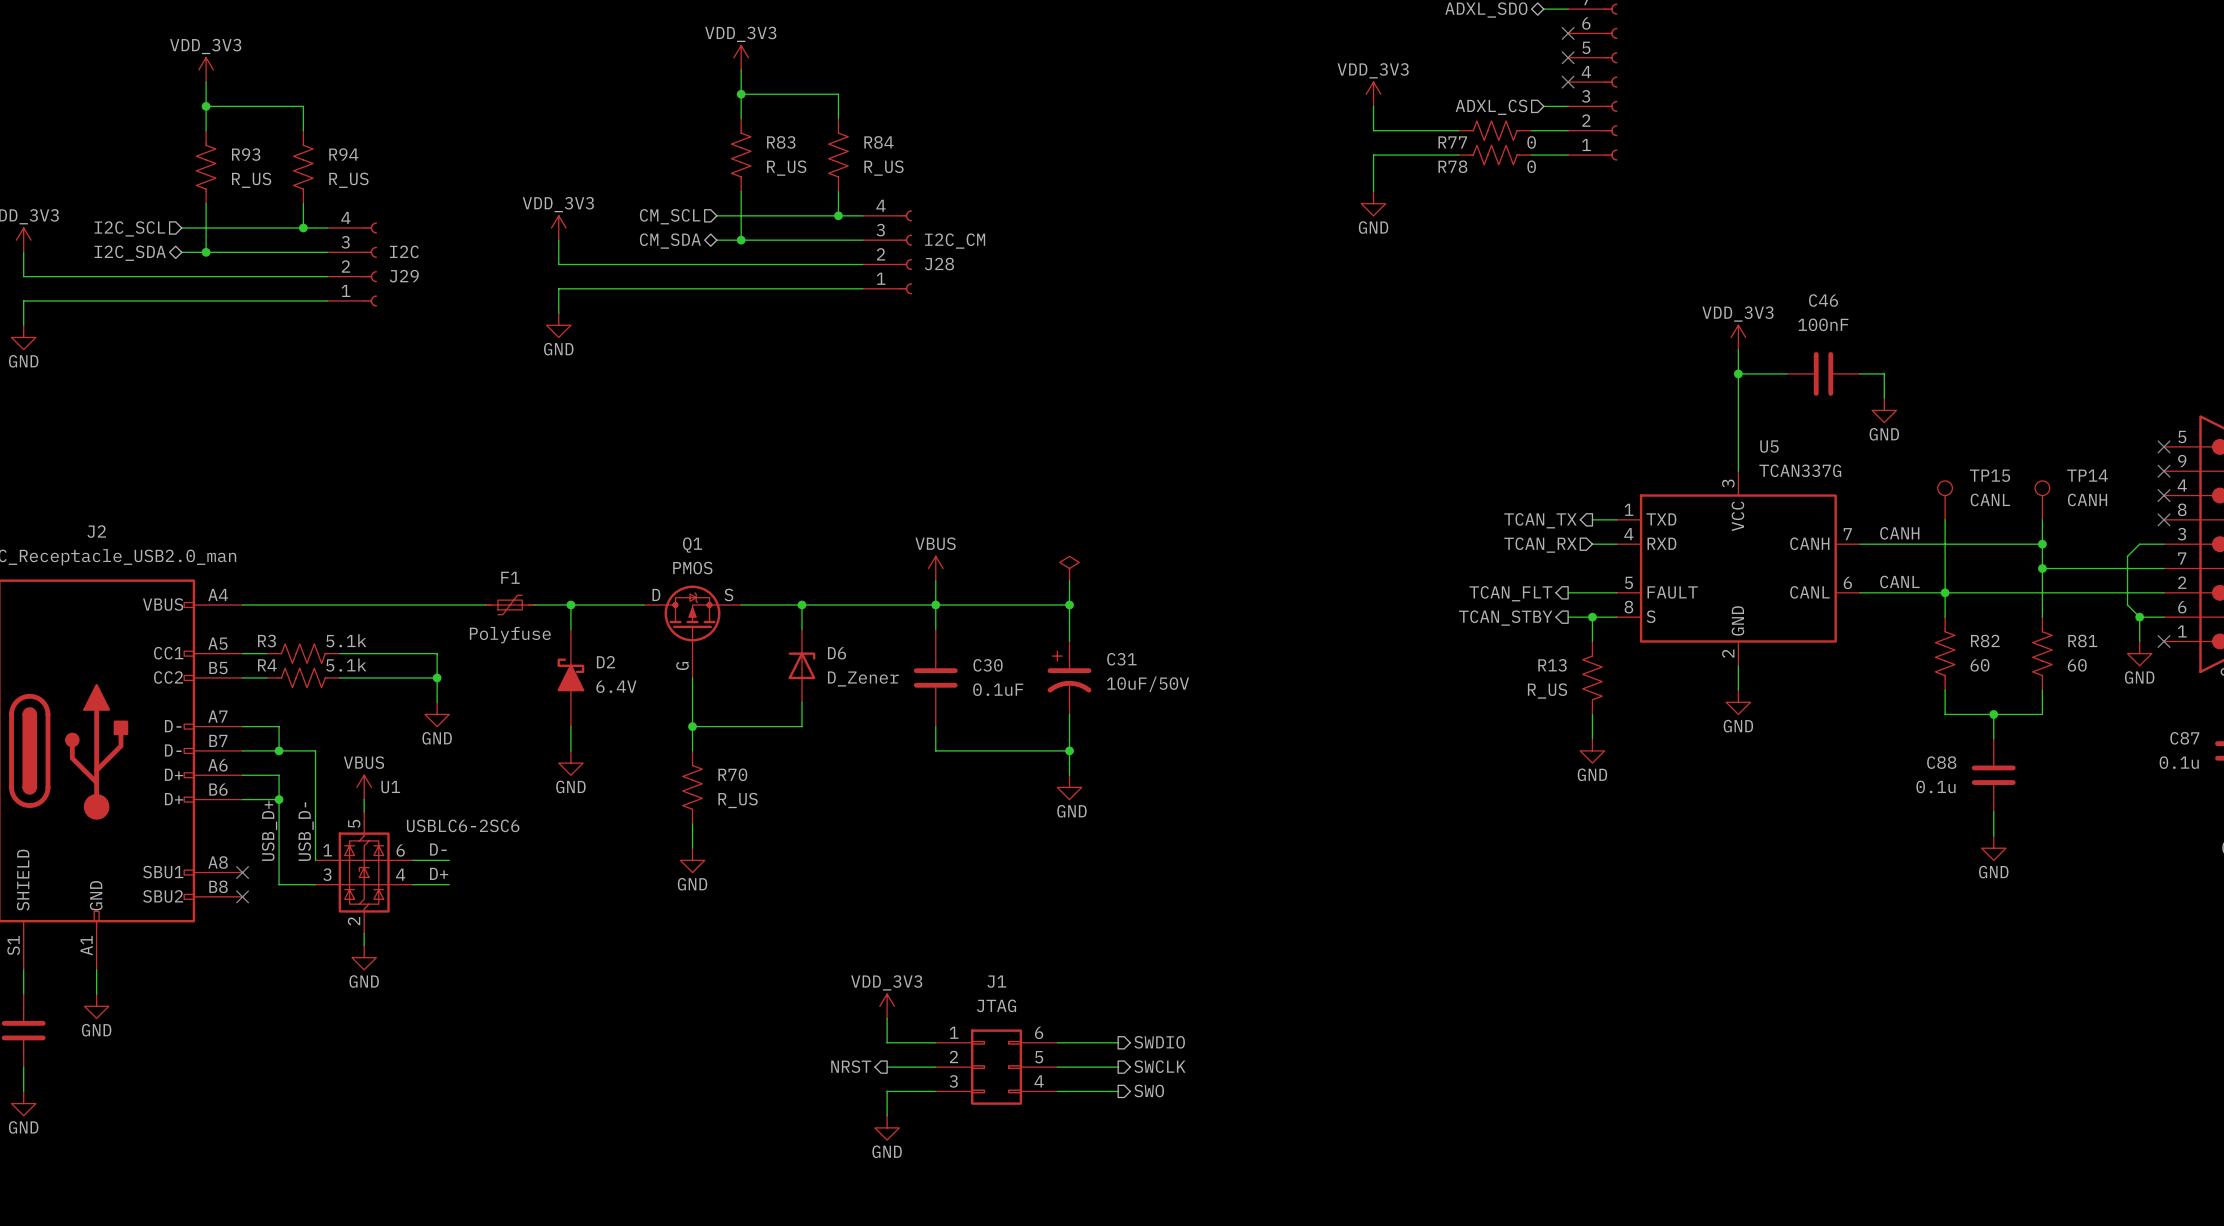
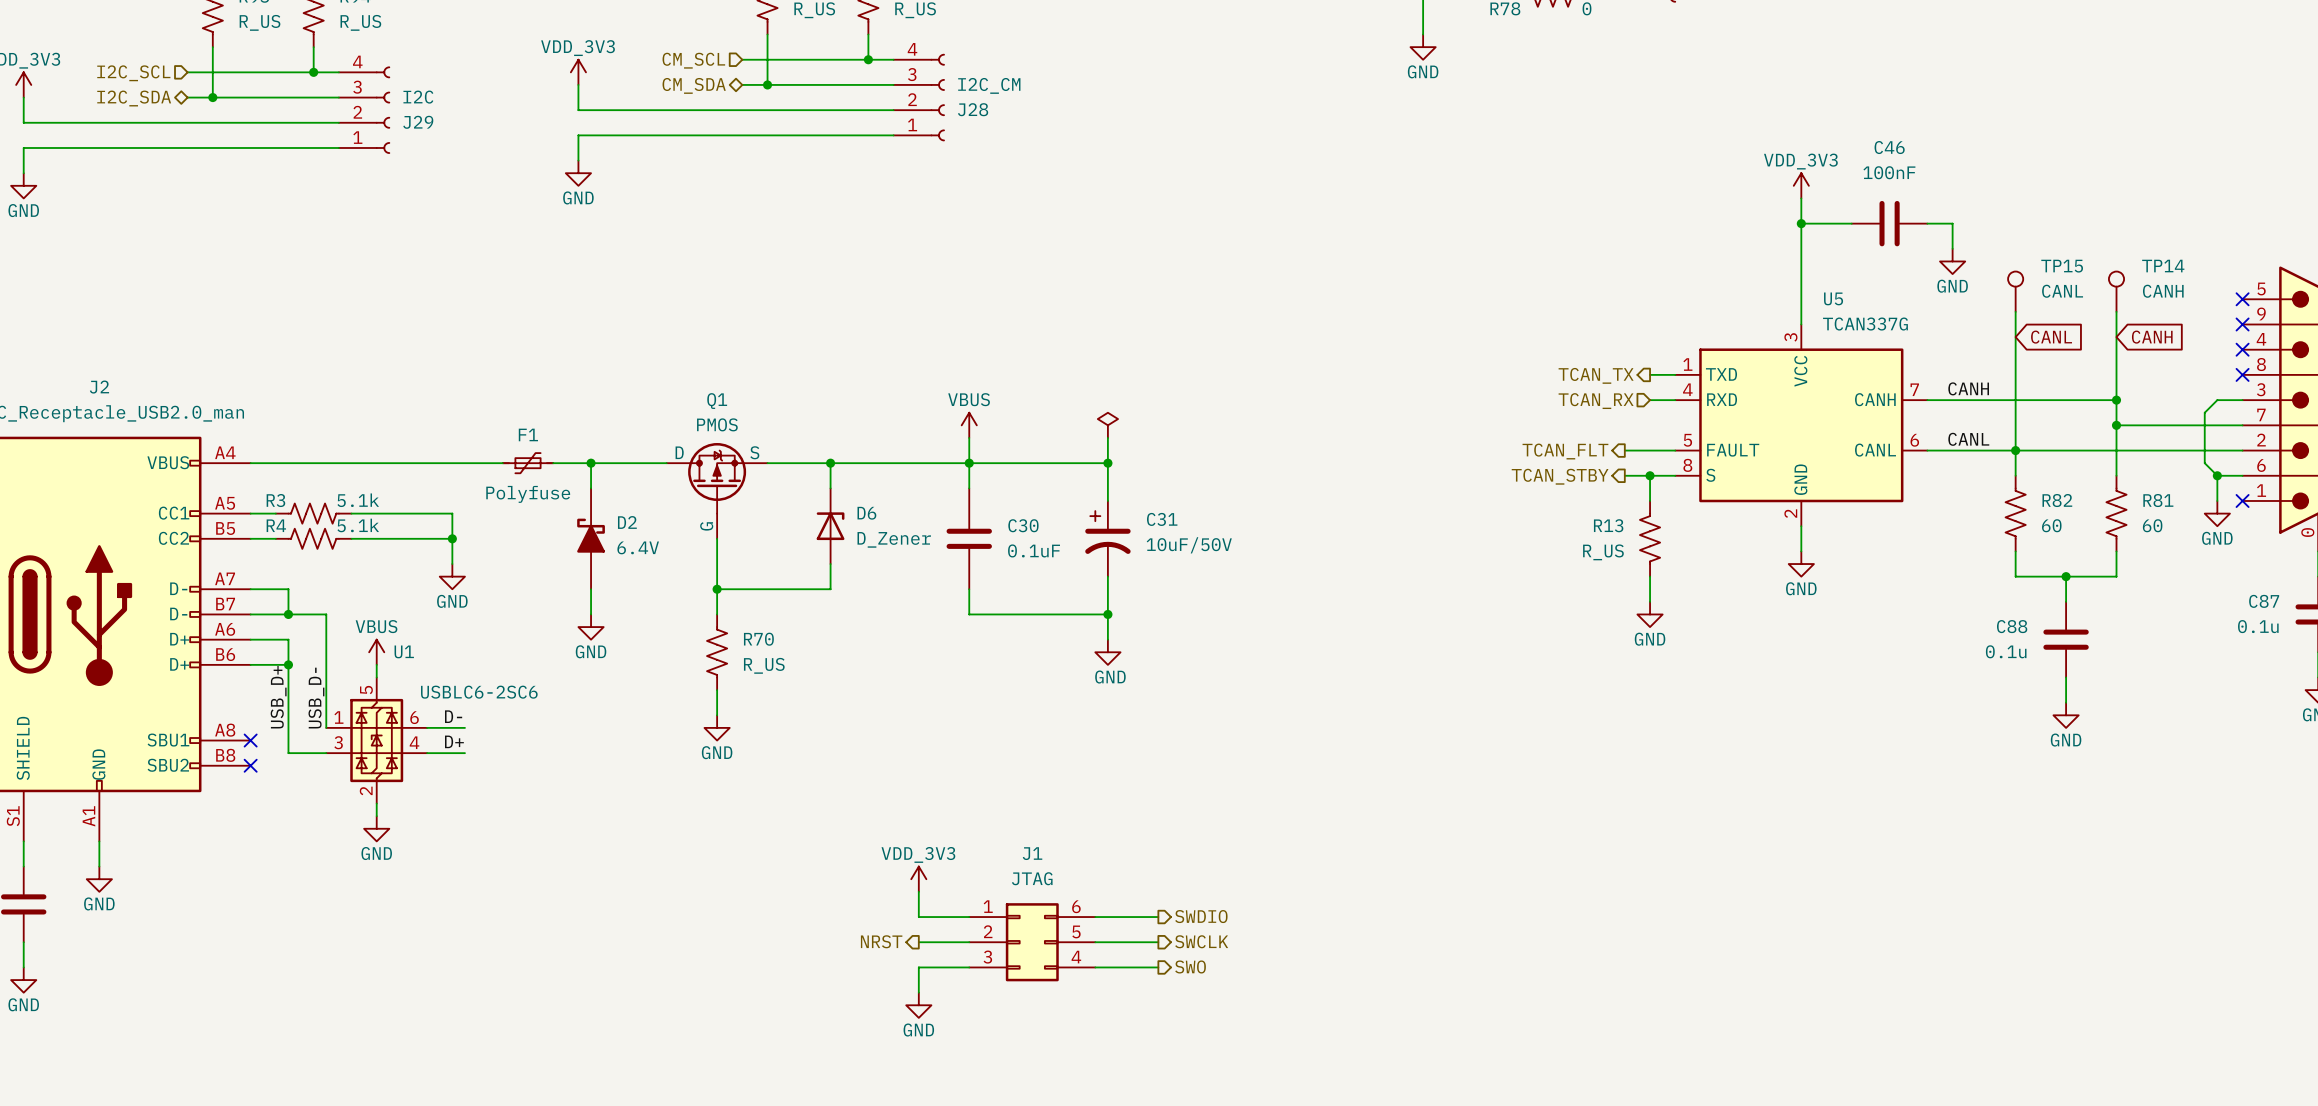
wire: none -> (2015, 311) (2015, 374)
wire: none -> (2116, 311) (2116, 374)
global label: none -> CANL (2051, 337)
global label: none -> CANH (2152, 337)
TP15 position: (1945, 500) -> (2015, 291)
TP14 position: (2042, 500) -> (2116, 291)

